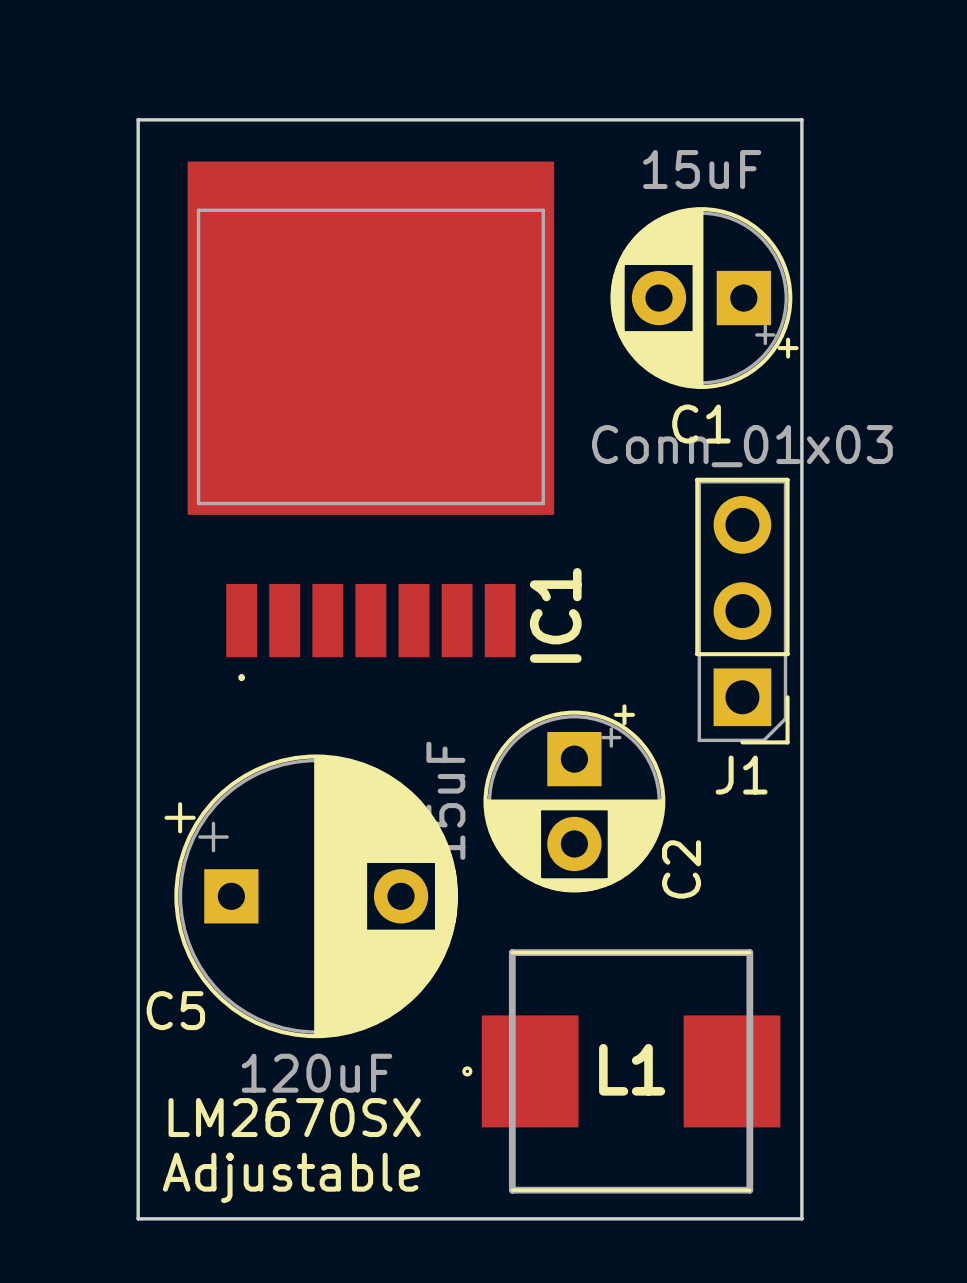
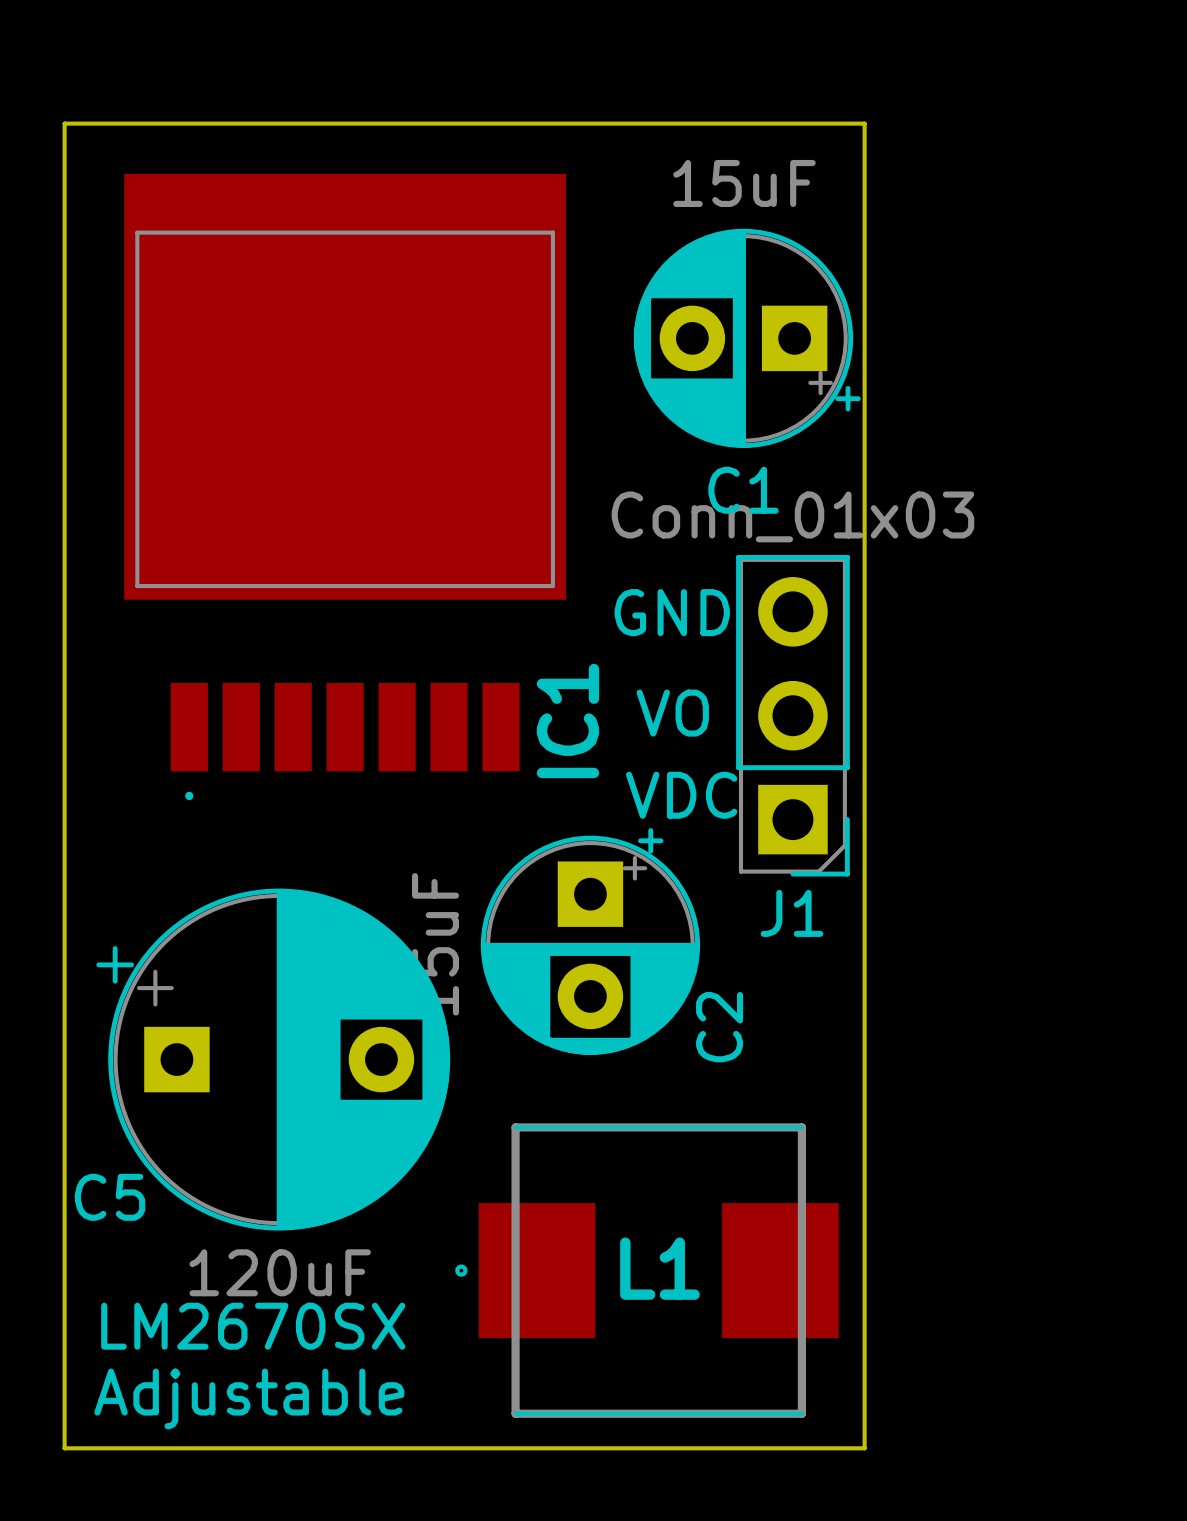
text: none -> GND (672, 612)
text: none -> VO (672, 713)
text: none -> VDC (681, 795)

